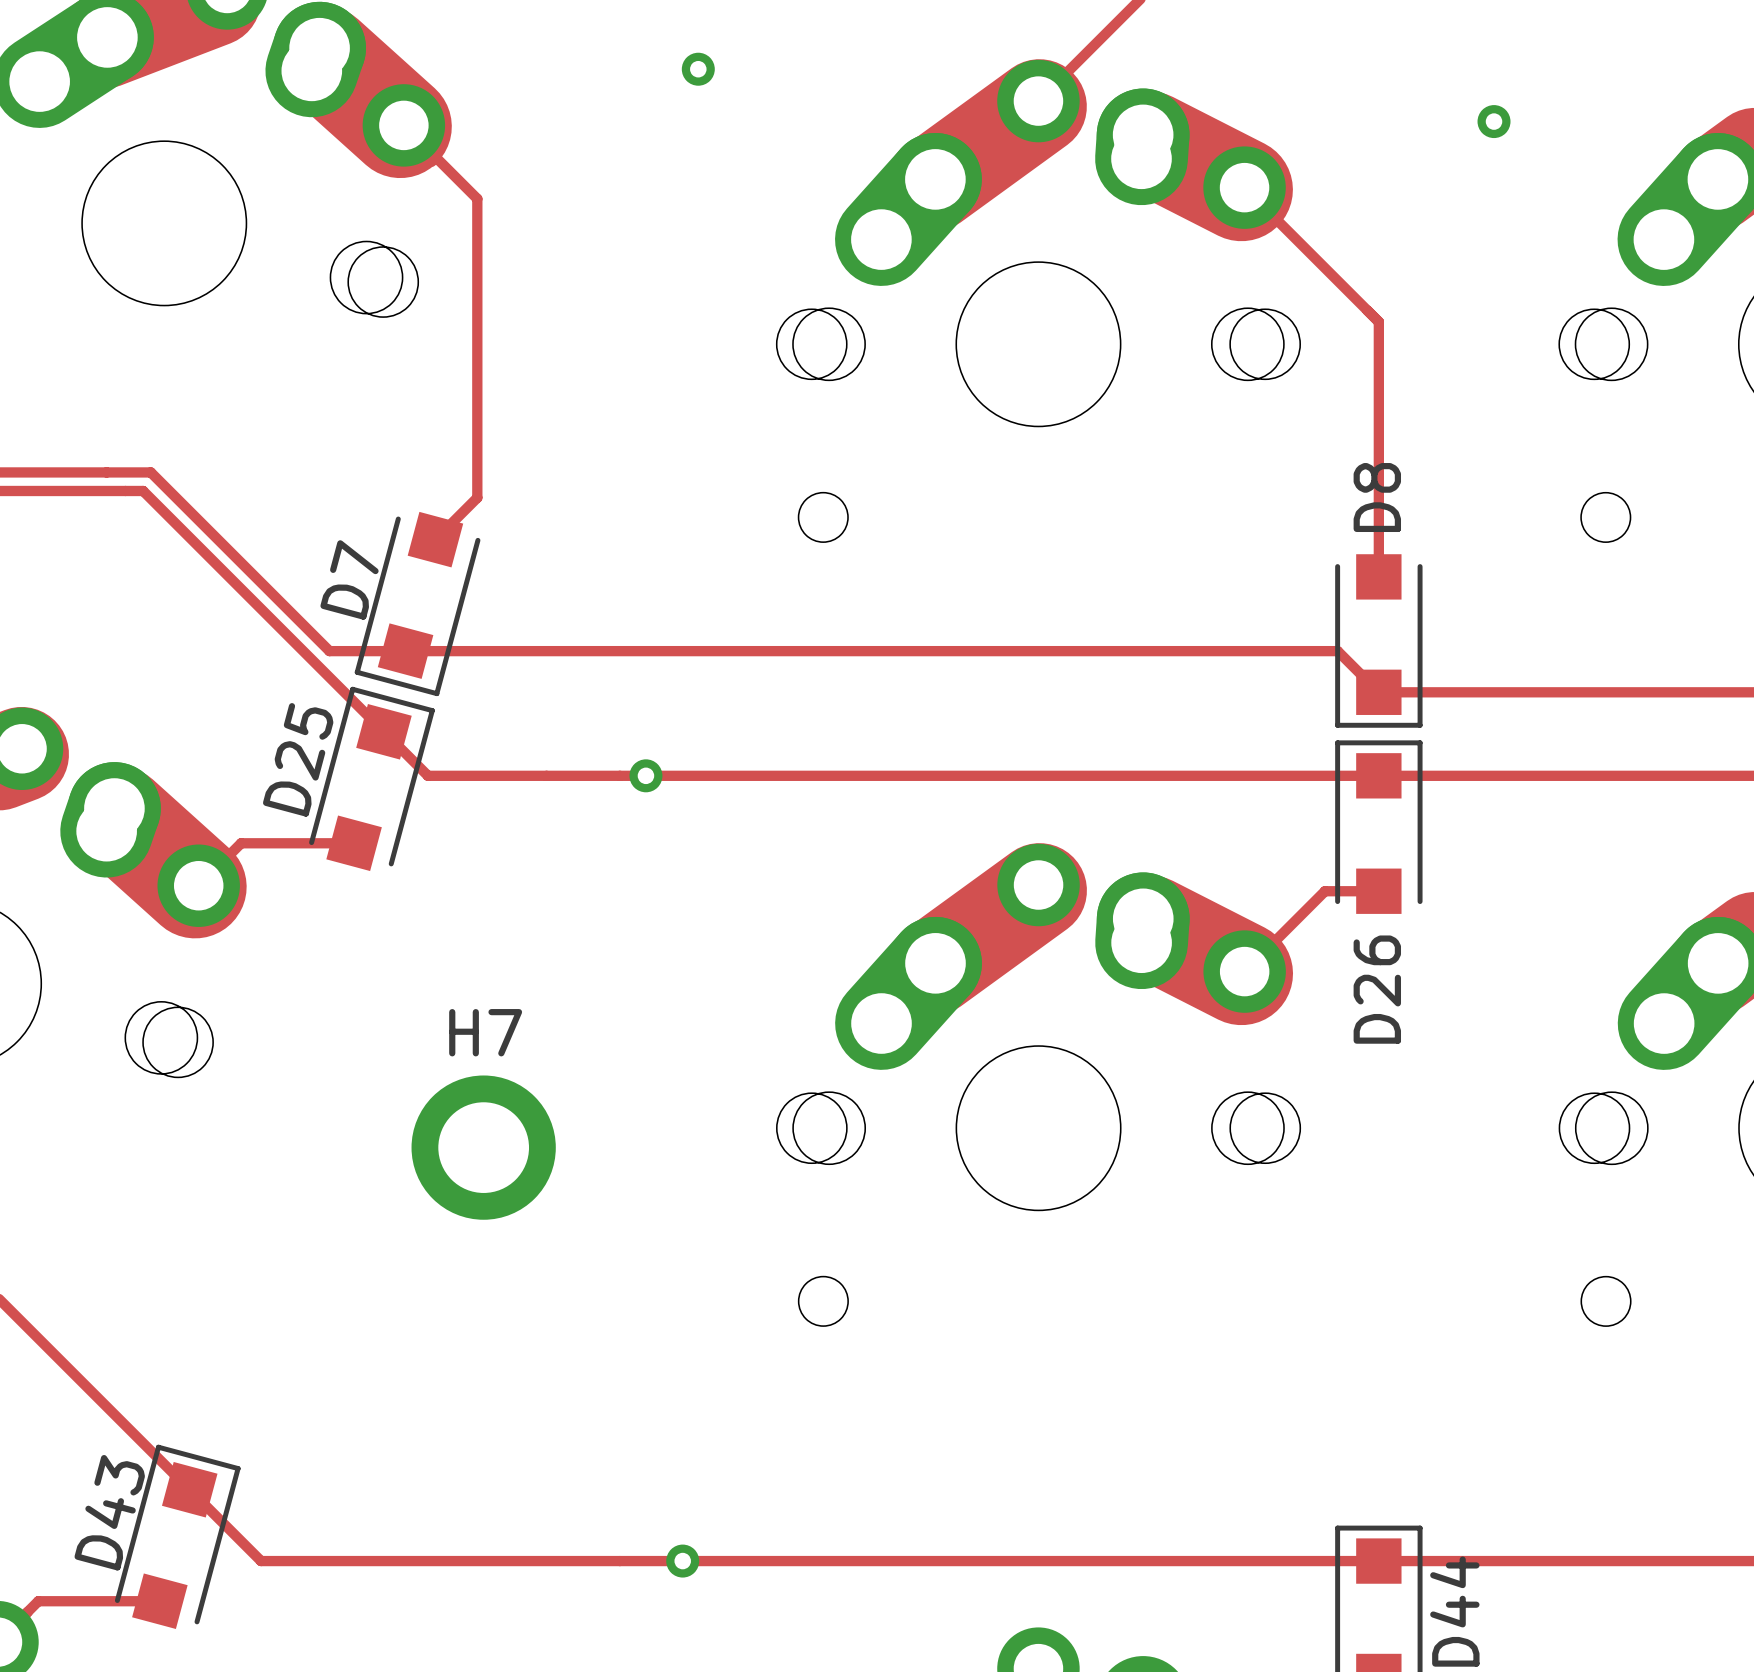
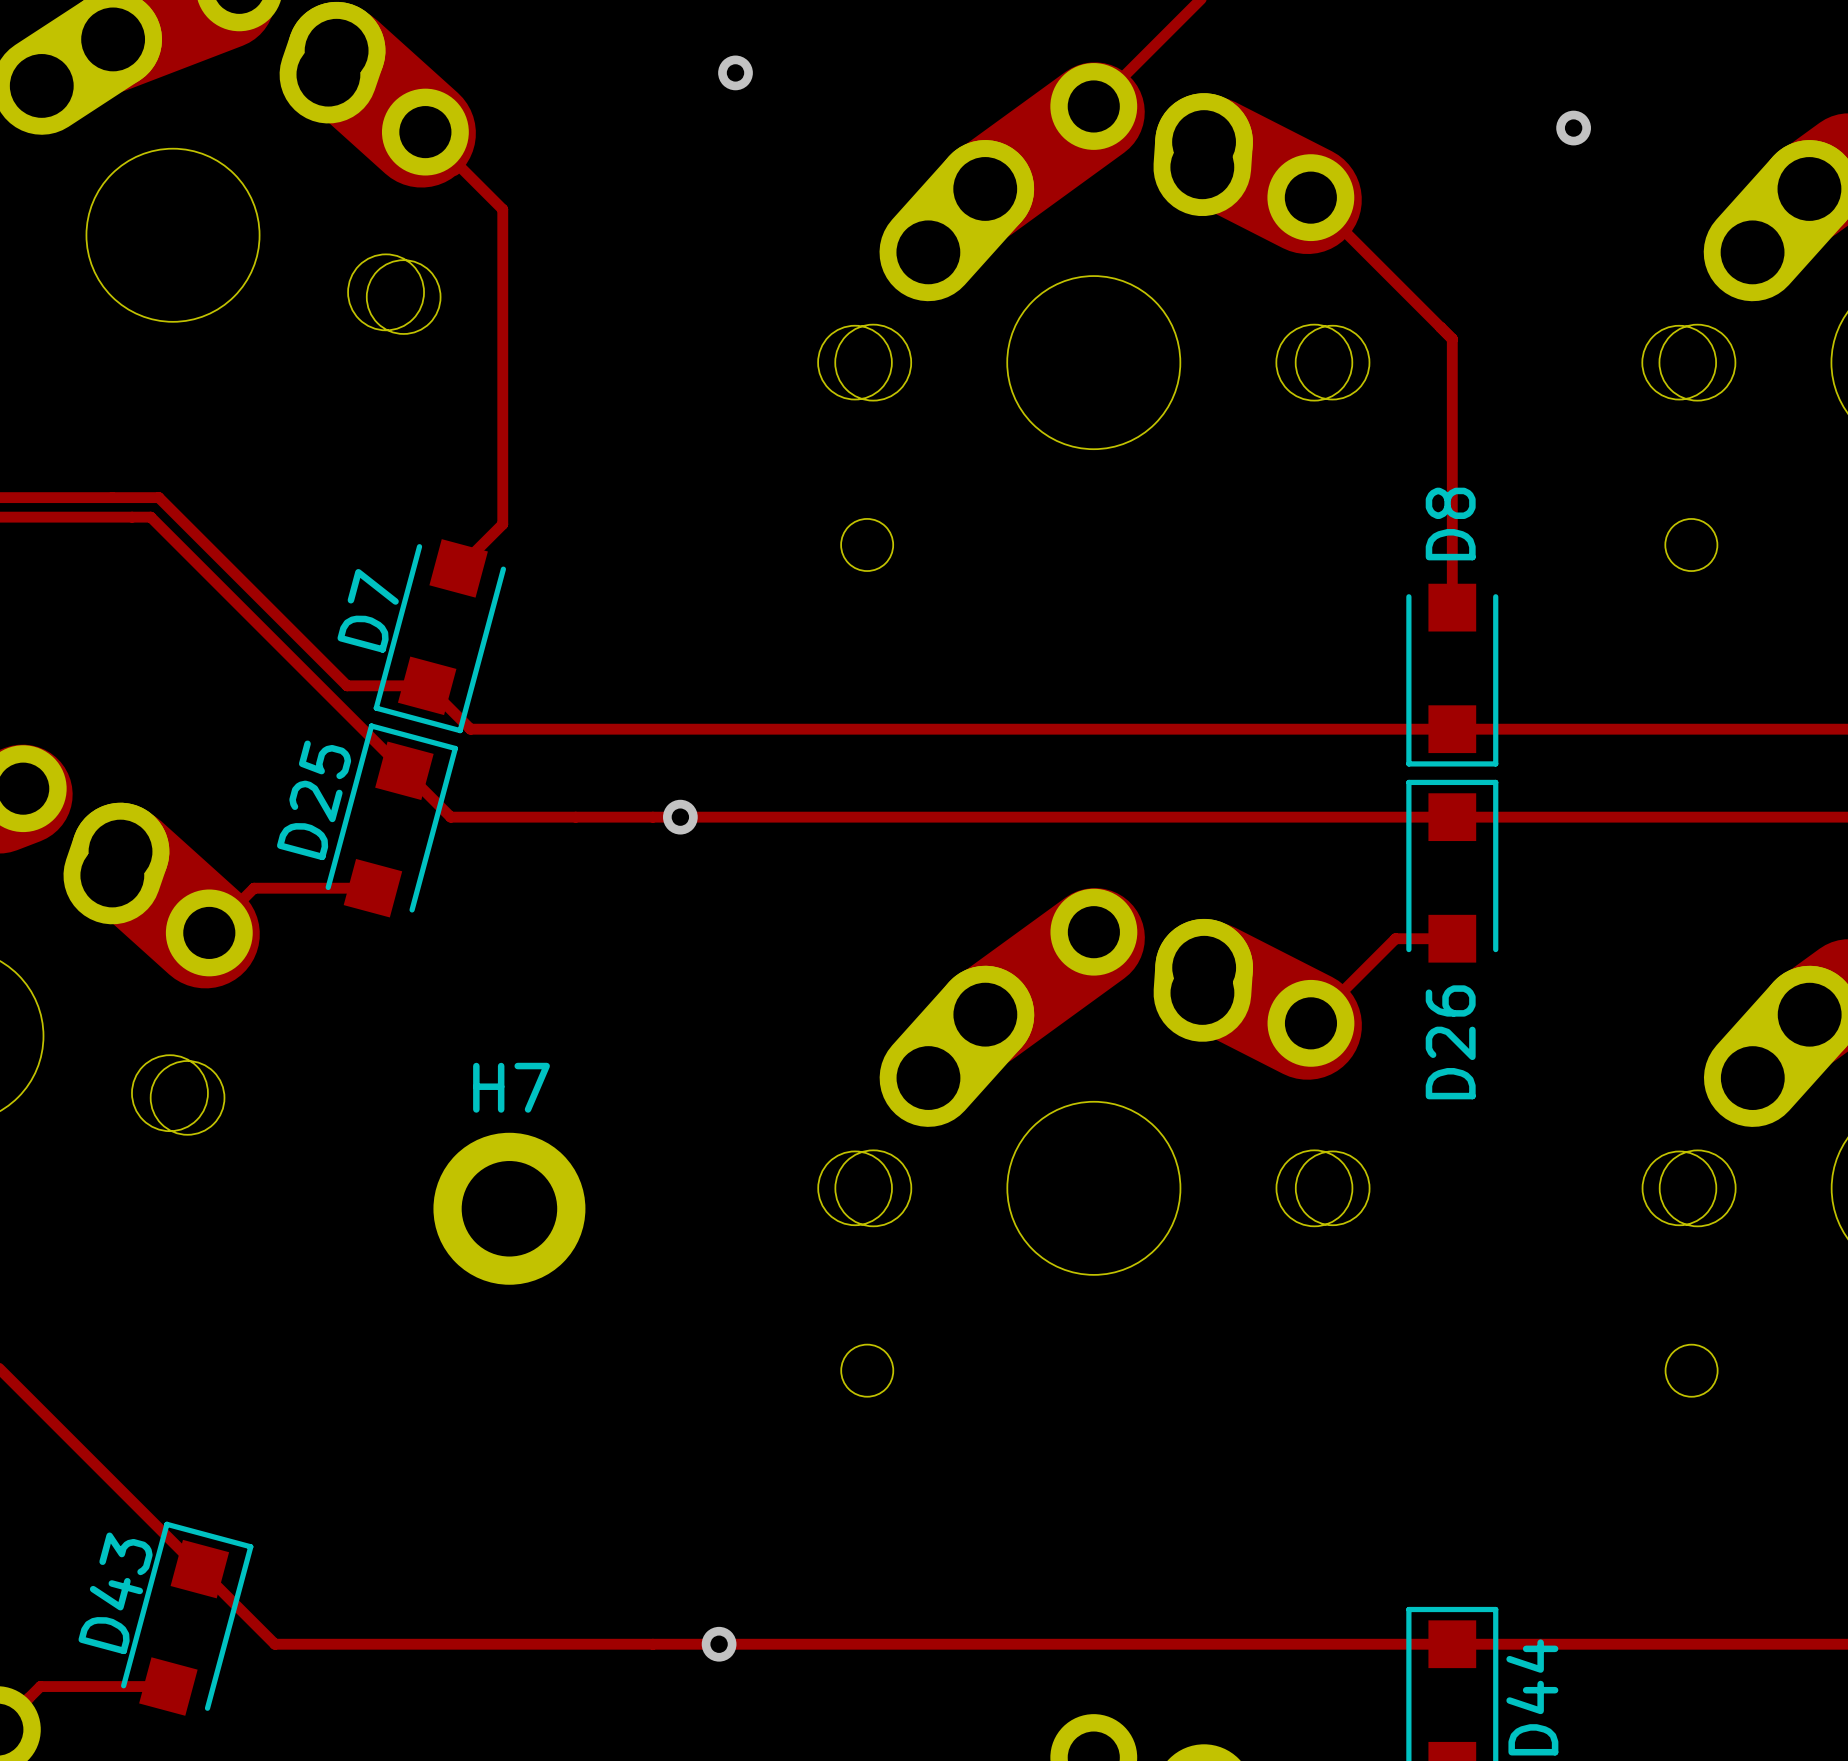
track: (405, 651) (1337, 651) (1378, 692) -> (427, 685) (470, 729) (1452, 729)

